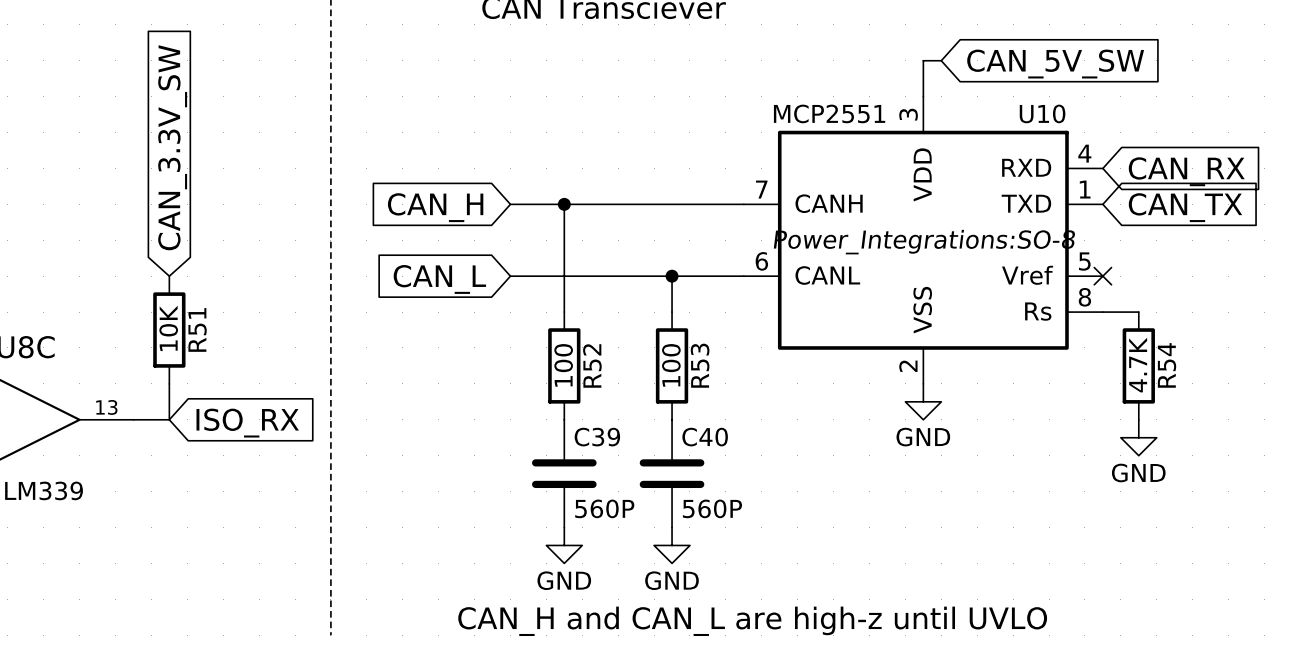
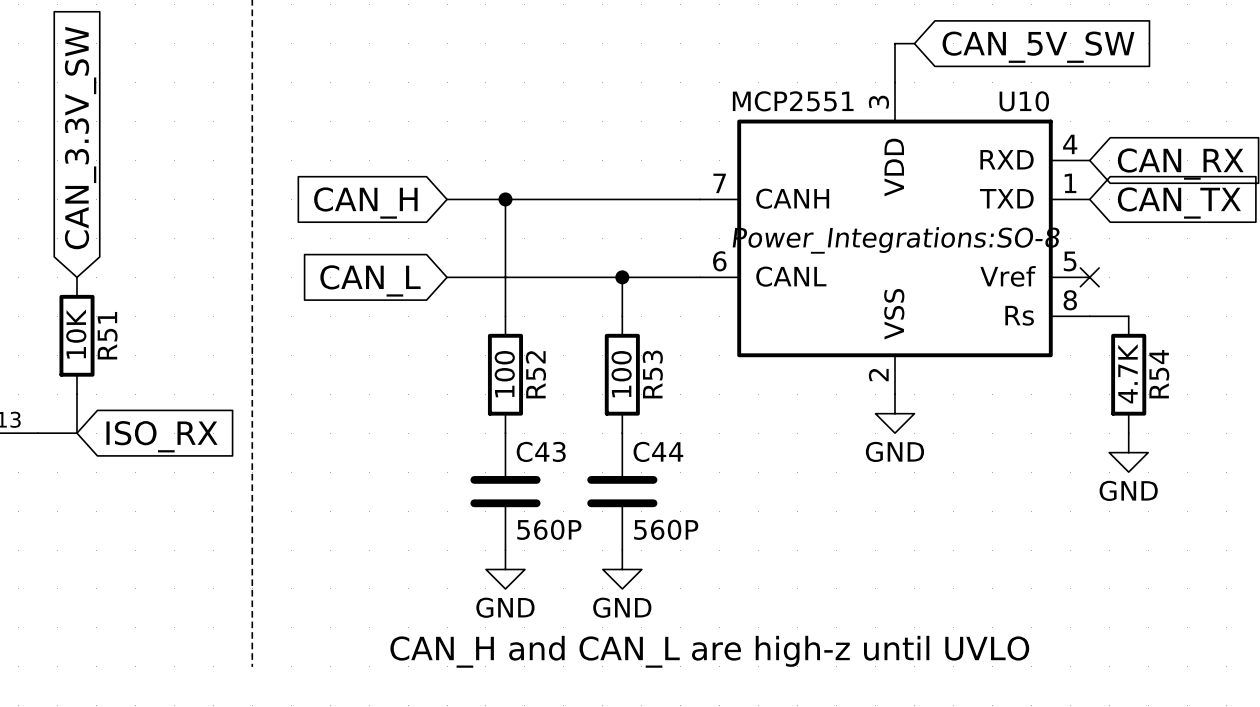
C39 name: C39 (597, 437) -> C43 (541, 451)
C40 name: C40 (705, 437) -> C44 (658, 451)

